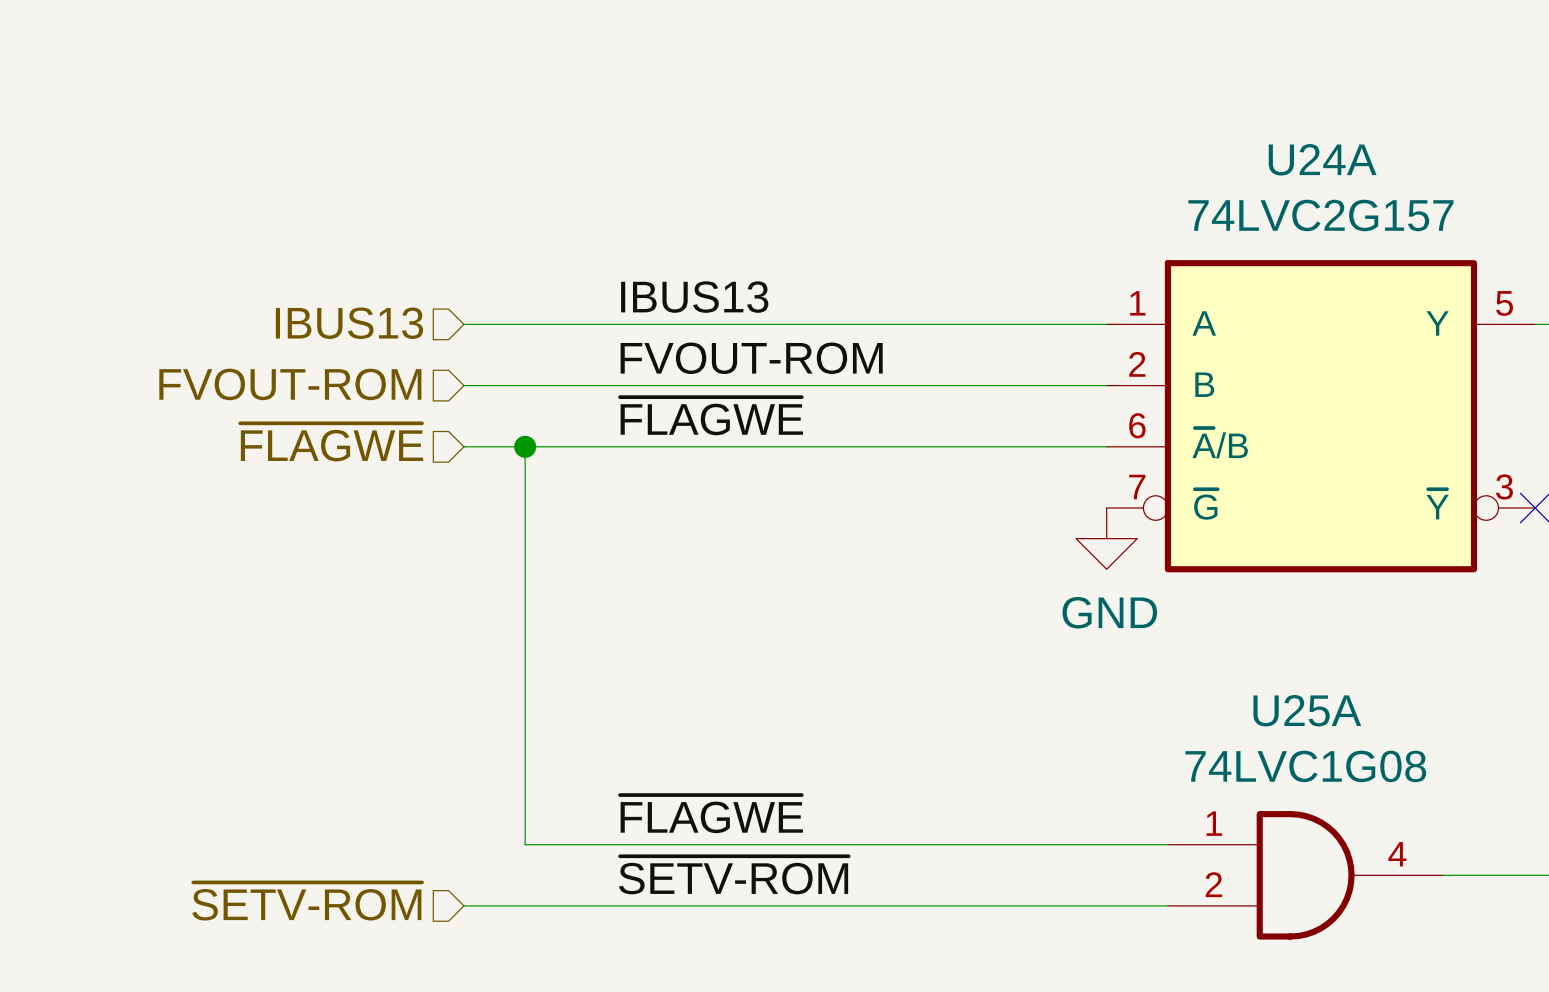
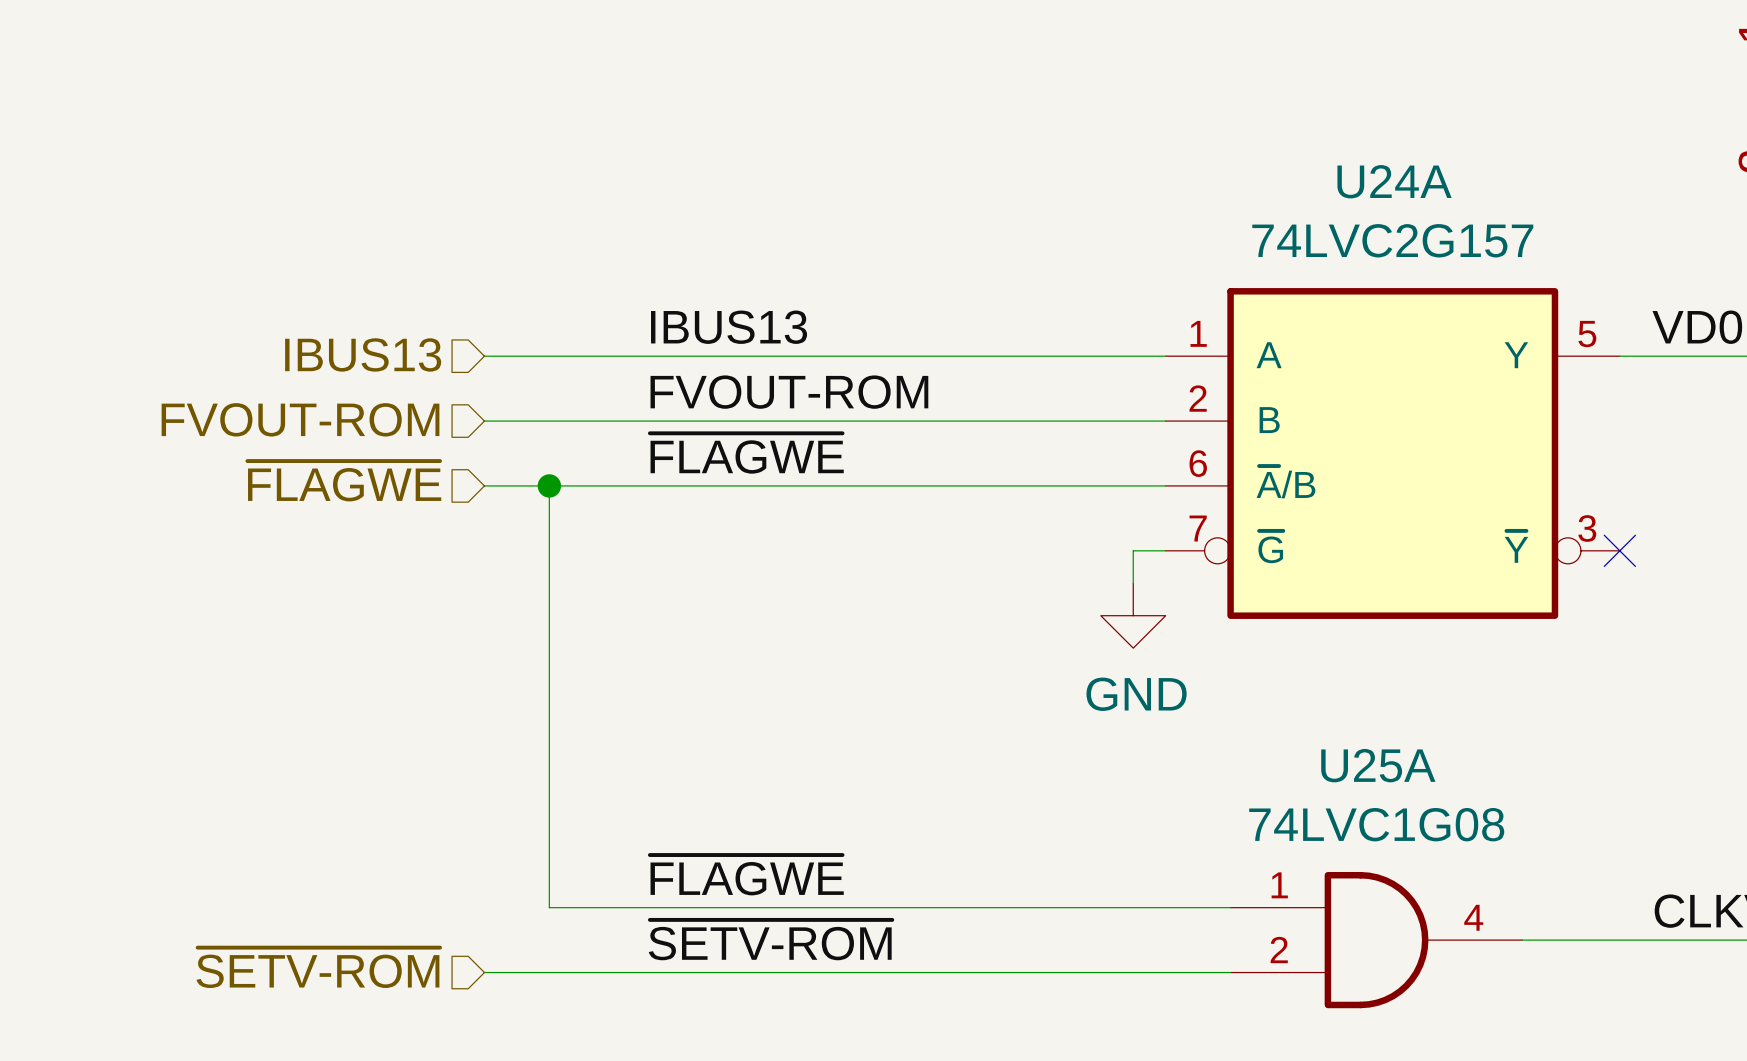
wire: none -> (1165, 550) (1133, 550) (1133, 583)
power symbol position: GND (1106, 538) -> GND (1133, 615)

